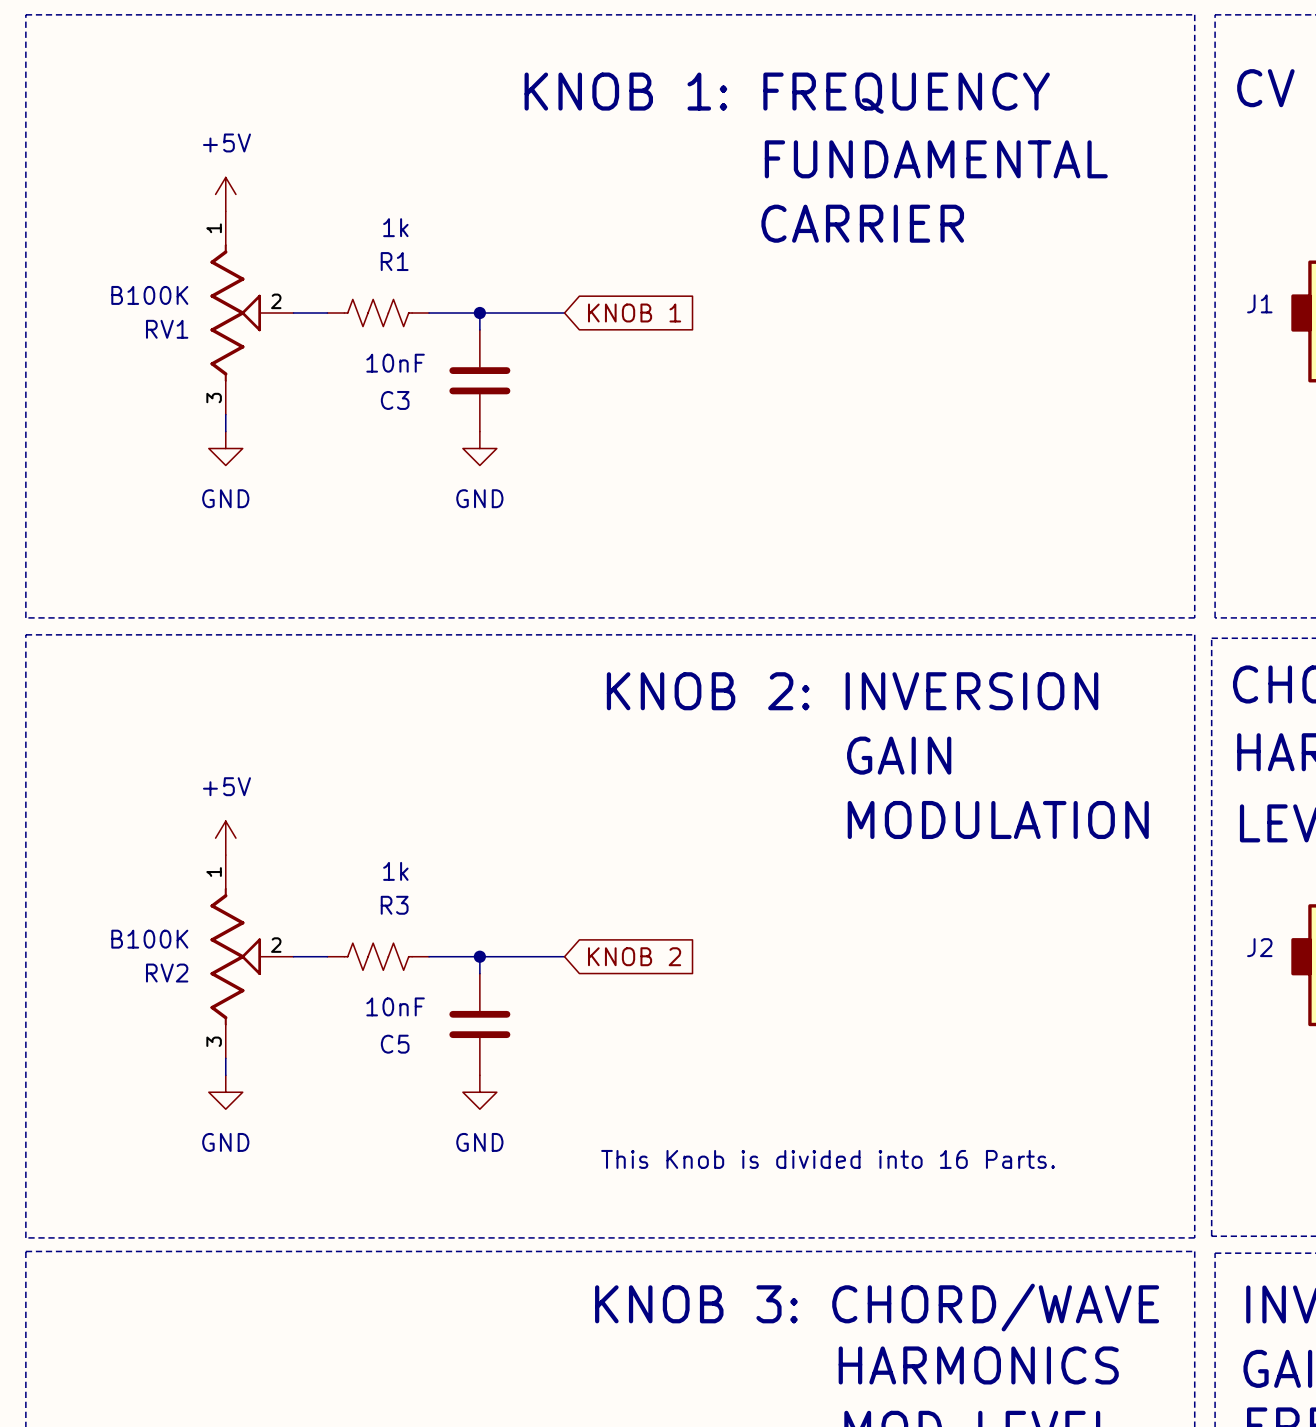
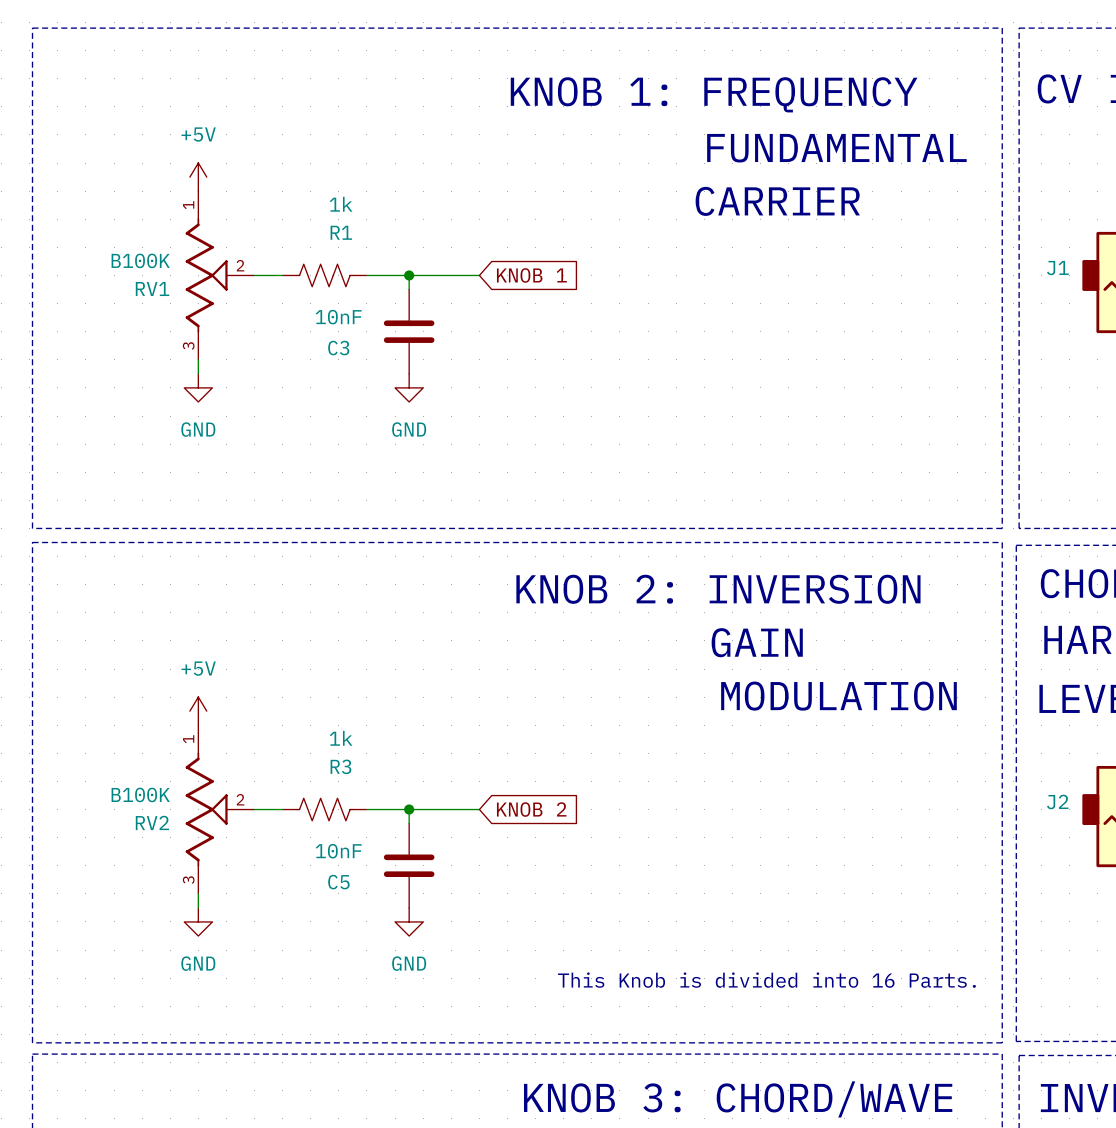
text position: KNOB 1: FREQUENCY (787, 93) -> KNOB 1: FREQUENCY (714, 94)
text position: FUNDAMENTAL (936, 159) -> FUNDAMENTAL (836, 148)
text position: CARRIER (862, 223) -> CARRIER (777, 201)
text position: This Knob is divided into 16 Parts. (828, 1159) -> This Knob is divided into 16 Parts. (766, 980)

